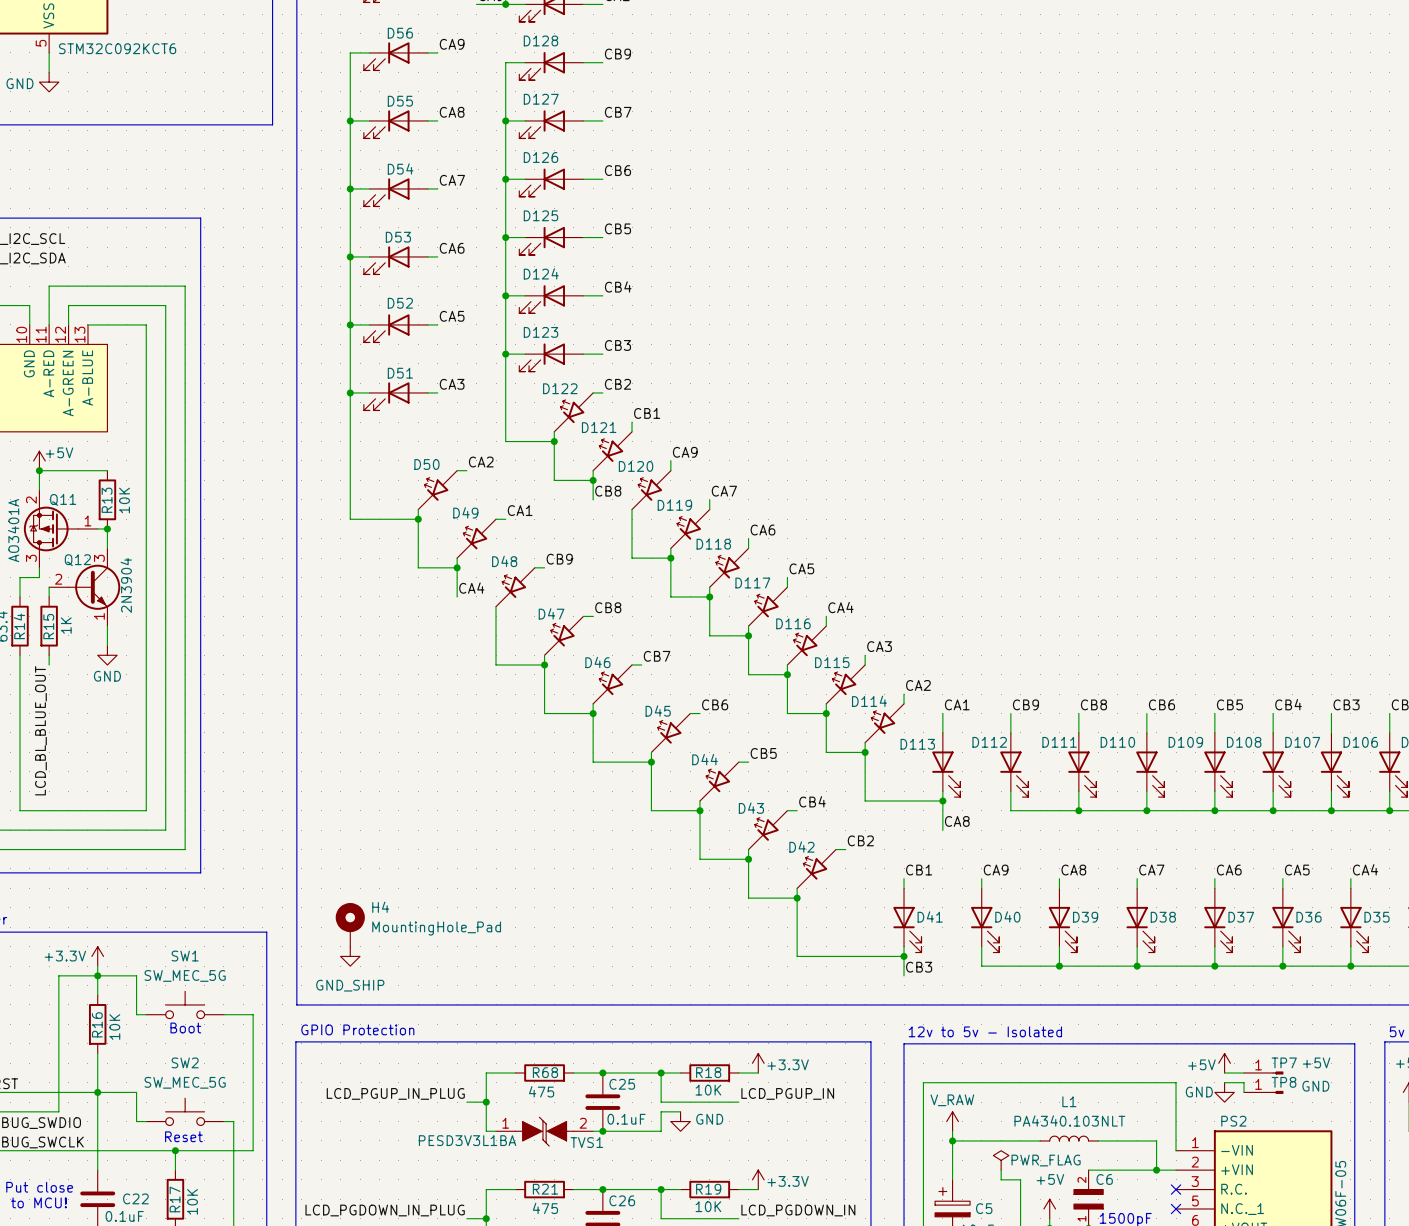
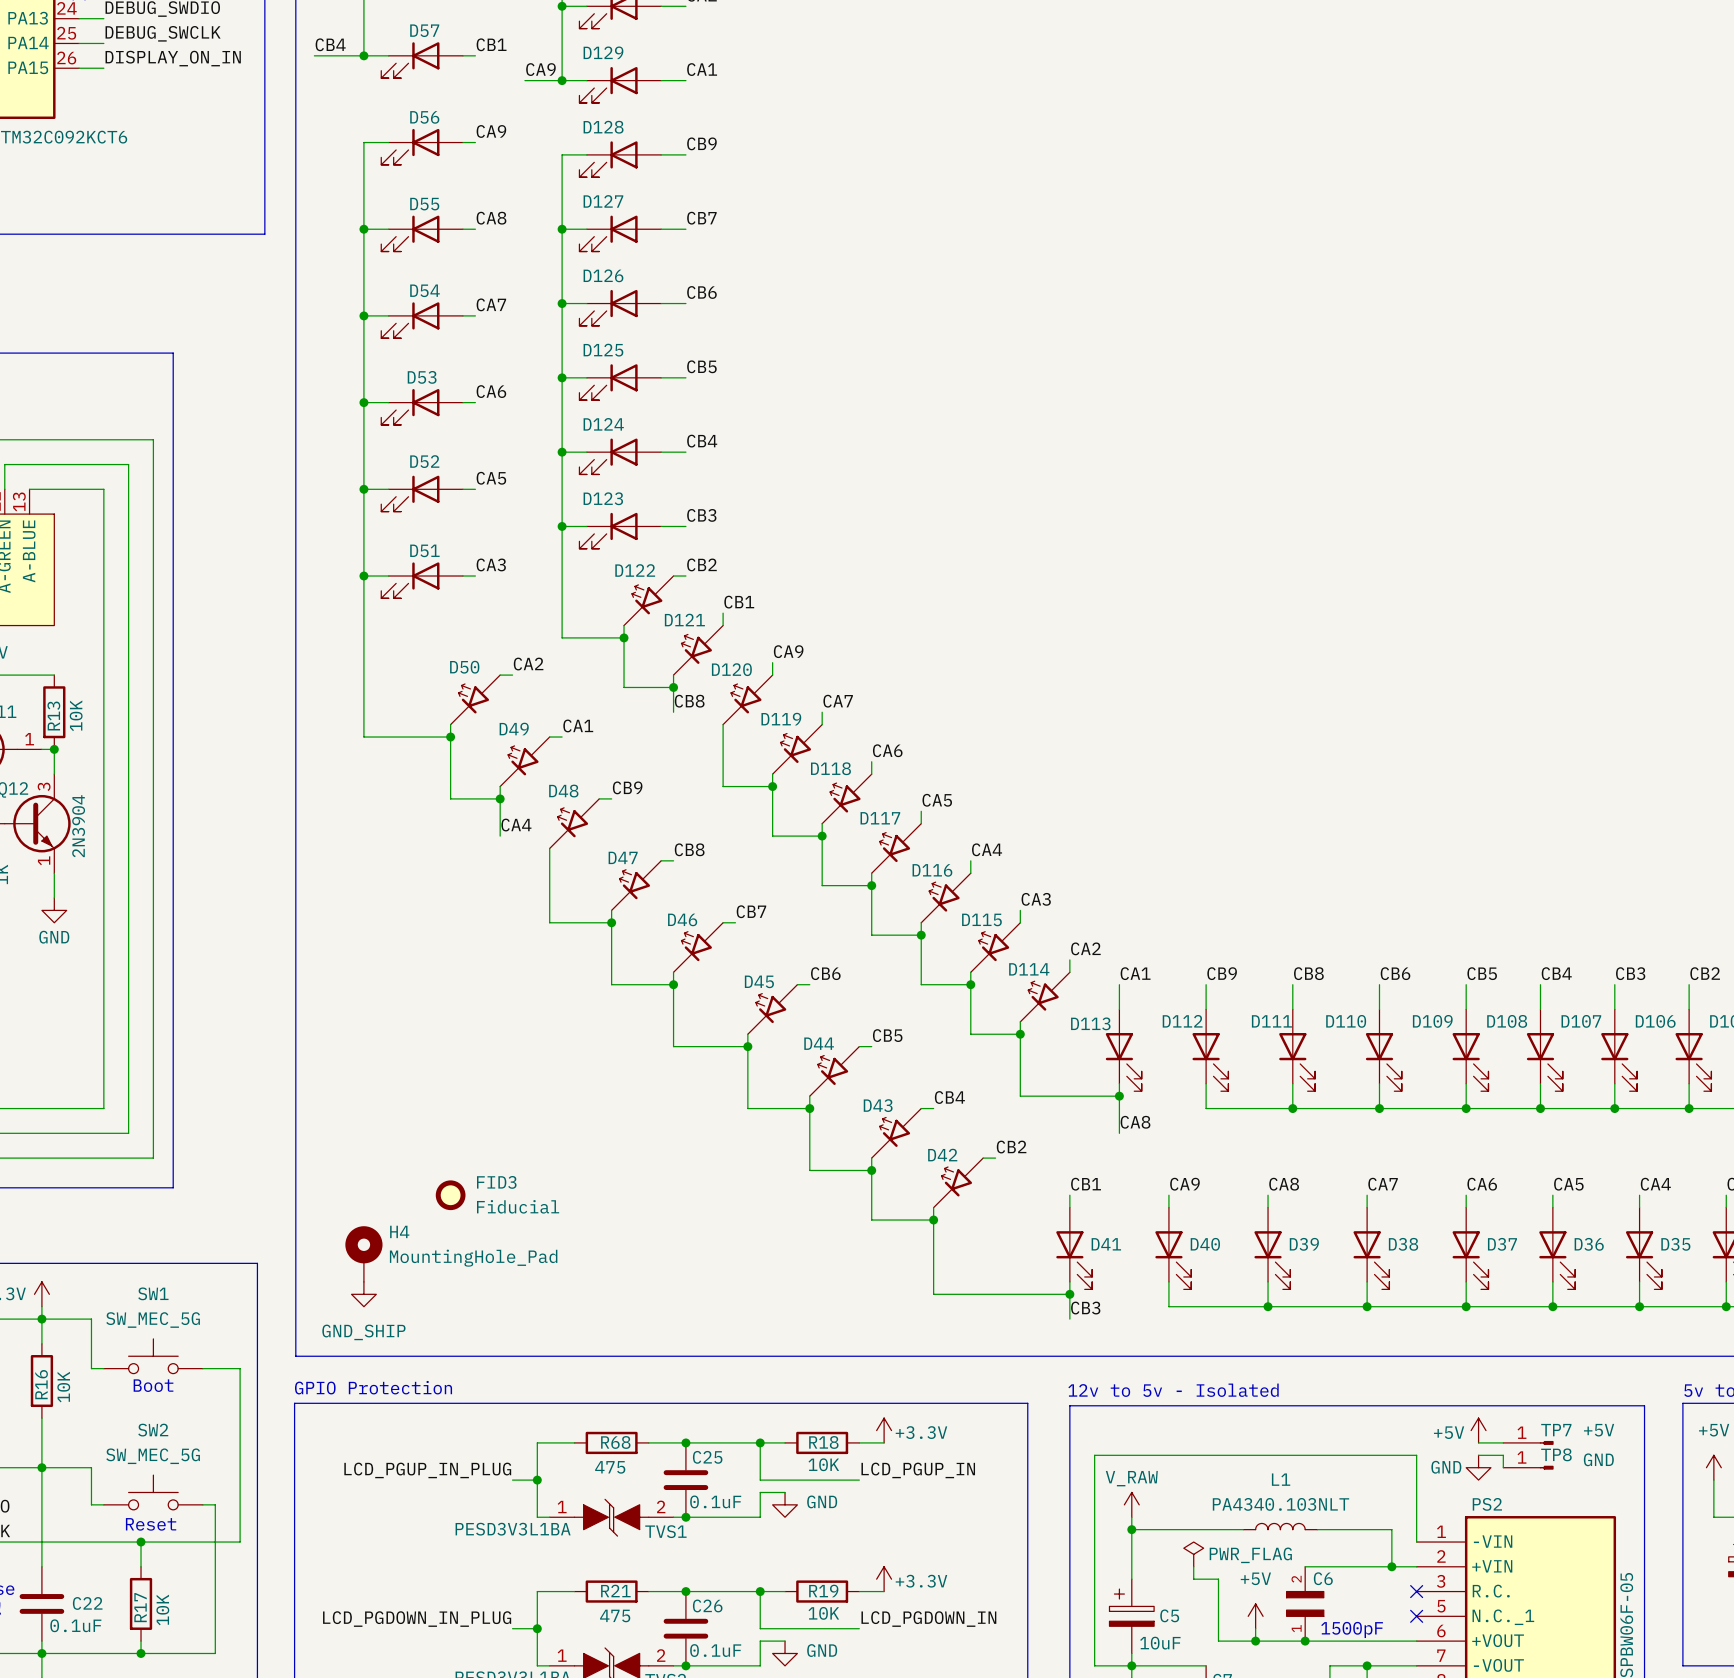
FID3: none -> Fiducial (450, 1195)

